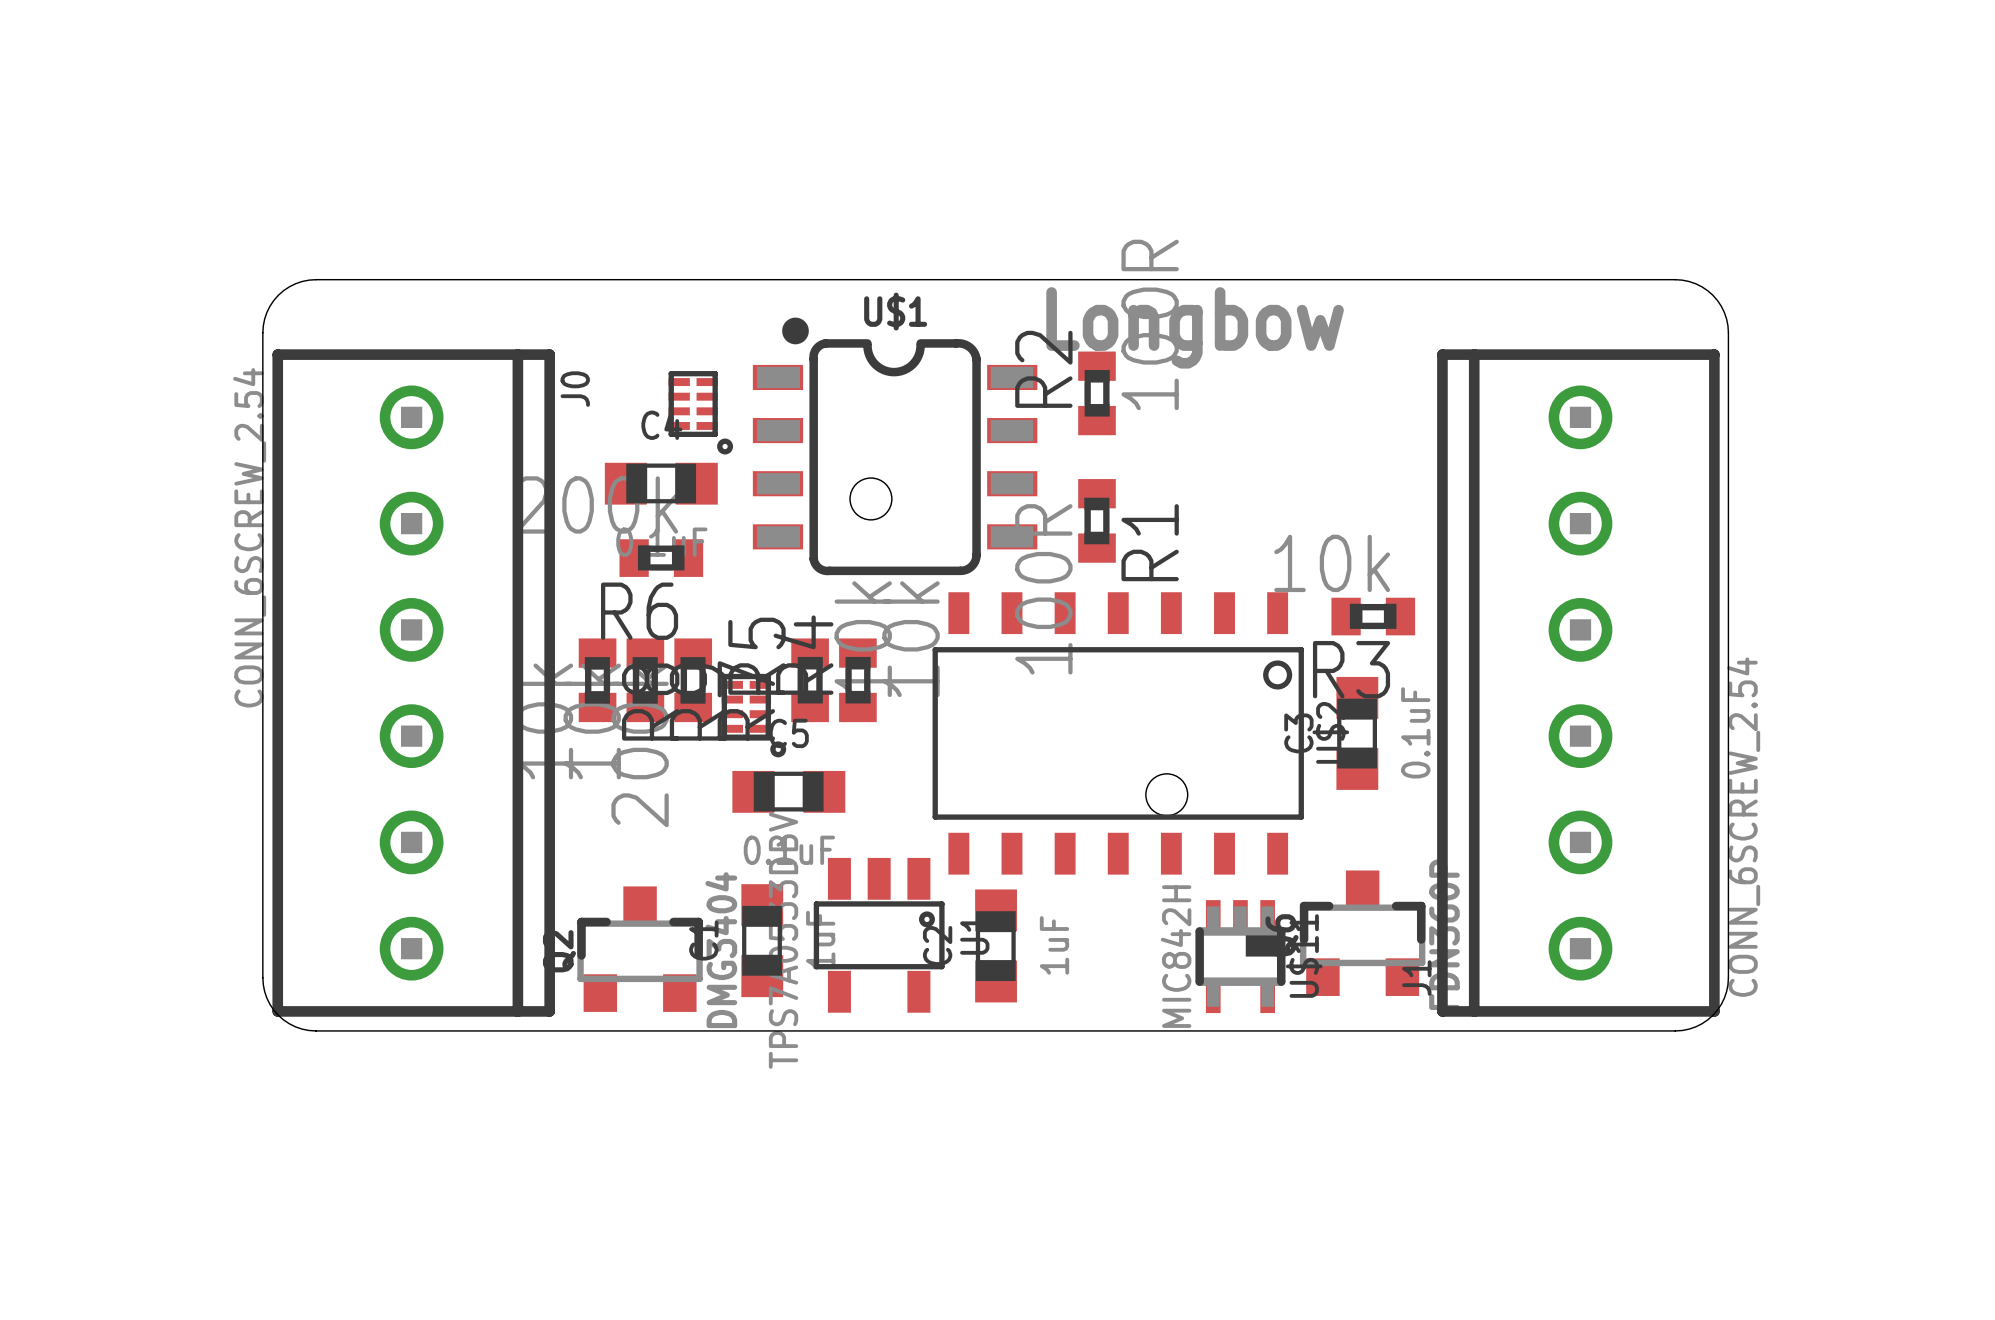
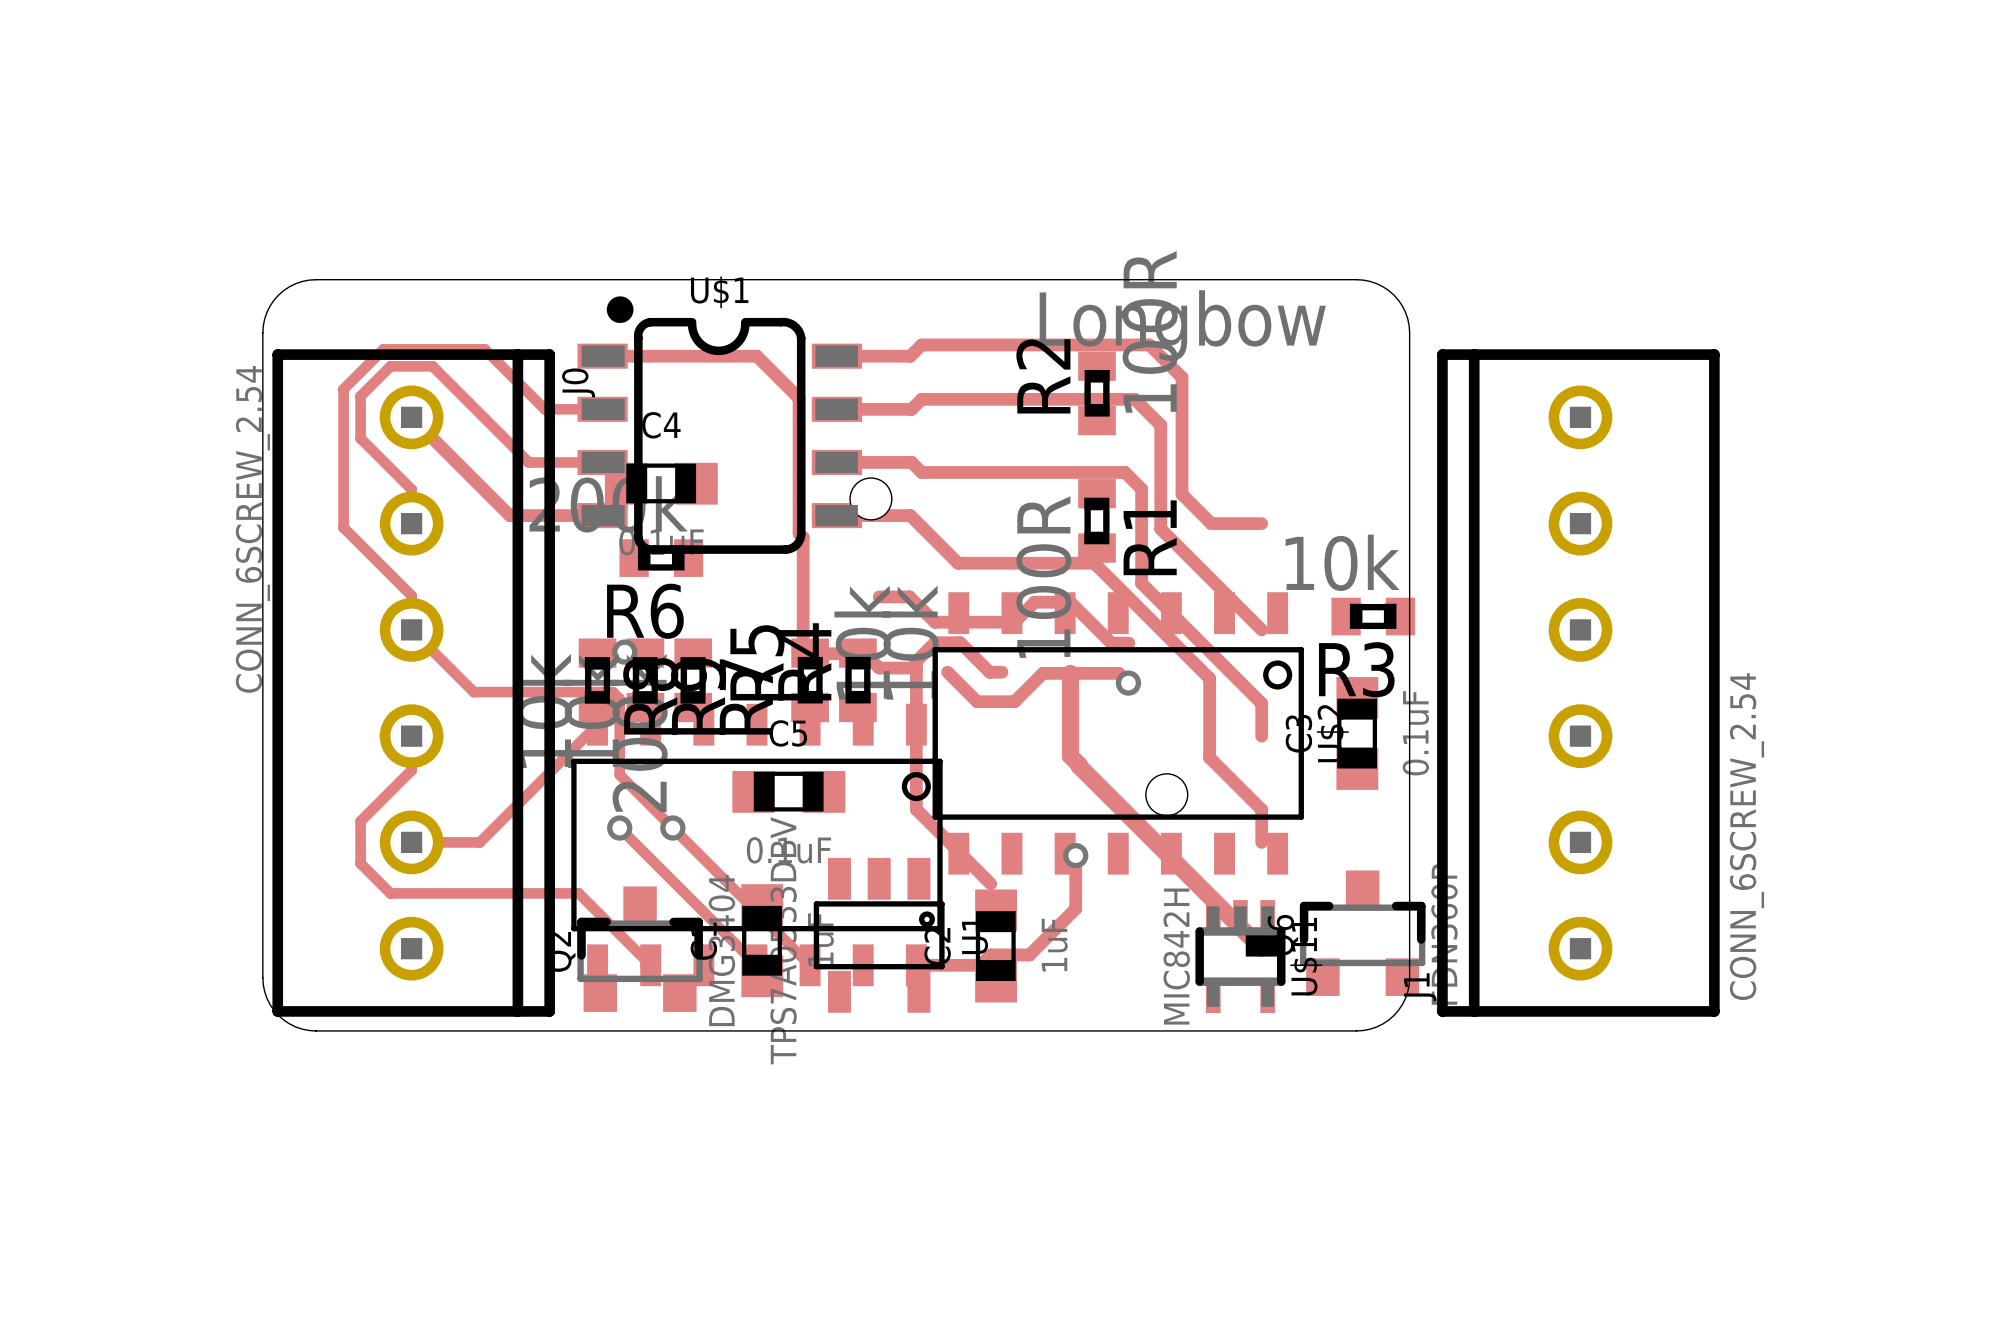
board edge: (1356, 279) (1682, 280) (1701, 286) (1717, 300) (1726, 319) (1728, 332) (1728, 977) (1726, 991) (1721, 1004) (1712, 1015) (1701, 1023) (1682, 1030) (1356, 1030) -> (1356, 279) (1376, 283) (1394, 295) (1405, 312) (1409, 332) (1409, 984) (1402, 1004) (1388, 1019) (1370, 1029) (1356, 1030)
track: none -> (602, 356) (756, 356) (799, 398) (799, 533) (803, 537) (803, 653) (864, 653) (879, 668) (914, 668) (916, 669)
track: none -> (836, 356) (910, 356) (921, 344) (1149, 344) (1182, 377) (1182, 494) (1211, 523) (1261, 523)
track: none -> (602, 409) (544, 409) (484, 349) (383, 349) (343, 389) (343, 527) (411, 595) (411, 629) (473, 692) (612, 692) (619, 698) (619, 774) (810, 965)
track: none -> (836, 409) (911, 409) (921, 399) (1134, 399) (1160, 425) (1160, 528) (1261, 629)
part: (700, 412) -> none
track: none -> (411, 417) (509, 515) (602, 515)
U$1 position: (895, 446) -> (719, 425)
track: none -> (603, 462) (528, 462) (432, 366) (390, 366) (360, 396) (360, 438) (411, 489) (411, 523)
track: none -> (836, 462) (911, 462) (921, 472) (1125, 472) (1141, 489) (1141, 583) (1261, 703) (1261, 736)
track: none -> (836, 515) (910, 515) (958, 563) (1094, 563) (1209, 678) (1209, 757) (1261, 809) (1261, 842)
track: none -> (879, 596) (909, 596) (935, 622) (1014, 622) (1034, 602) (1070, 602) (1111, 643) (1128, 643)
via: none -> (624, 652)
track: none -> (947, 672) (977, 701) (1014, 701) (1042, 673) (1118, 673) (1128, 683)
track: none -> (1001, 672) (989, 672) (960, 642) (935, 642) (916, 661) (916, 809) (990, 883)
track: none -> (1070, 673) (1070, 756) (1261, 948)
via: none -> (1128, 683)
part: (753, 715) -> none
track: none -> (597, 724) (479, 842) (411, 842)
track: none -> (411, 736) (411, 770) (360, 821) (360, 863) (390, 893) (578, 893) (650, 965) (645, 965)
track: none -> (619, 828) (756, 965)
via: none -> (619, 828)
via: none -> (672, 828)
part: none -> (756, 845)
track: none -> (1075, 855) (1075, 908) (1029, 954) (990, 954) (980, 965) (916, 965)
via: none -> (1075, 855)

